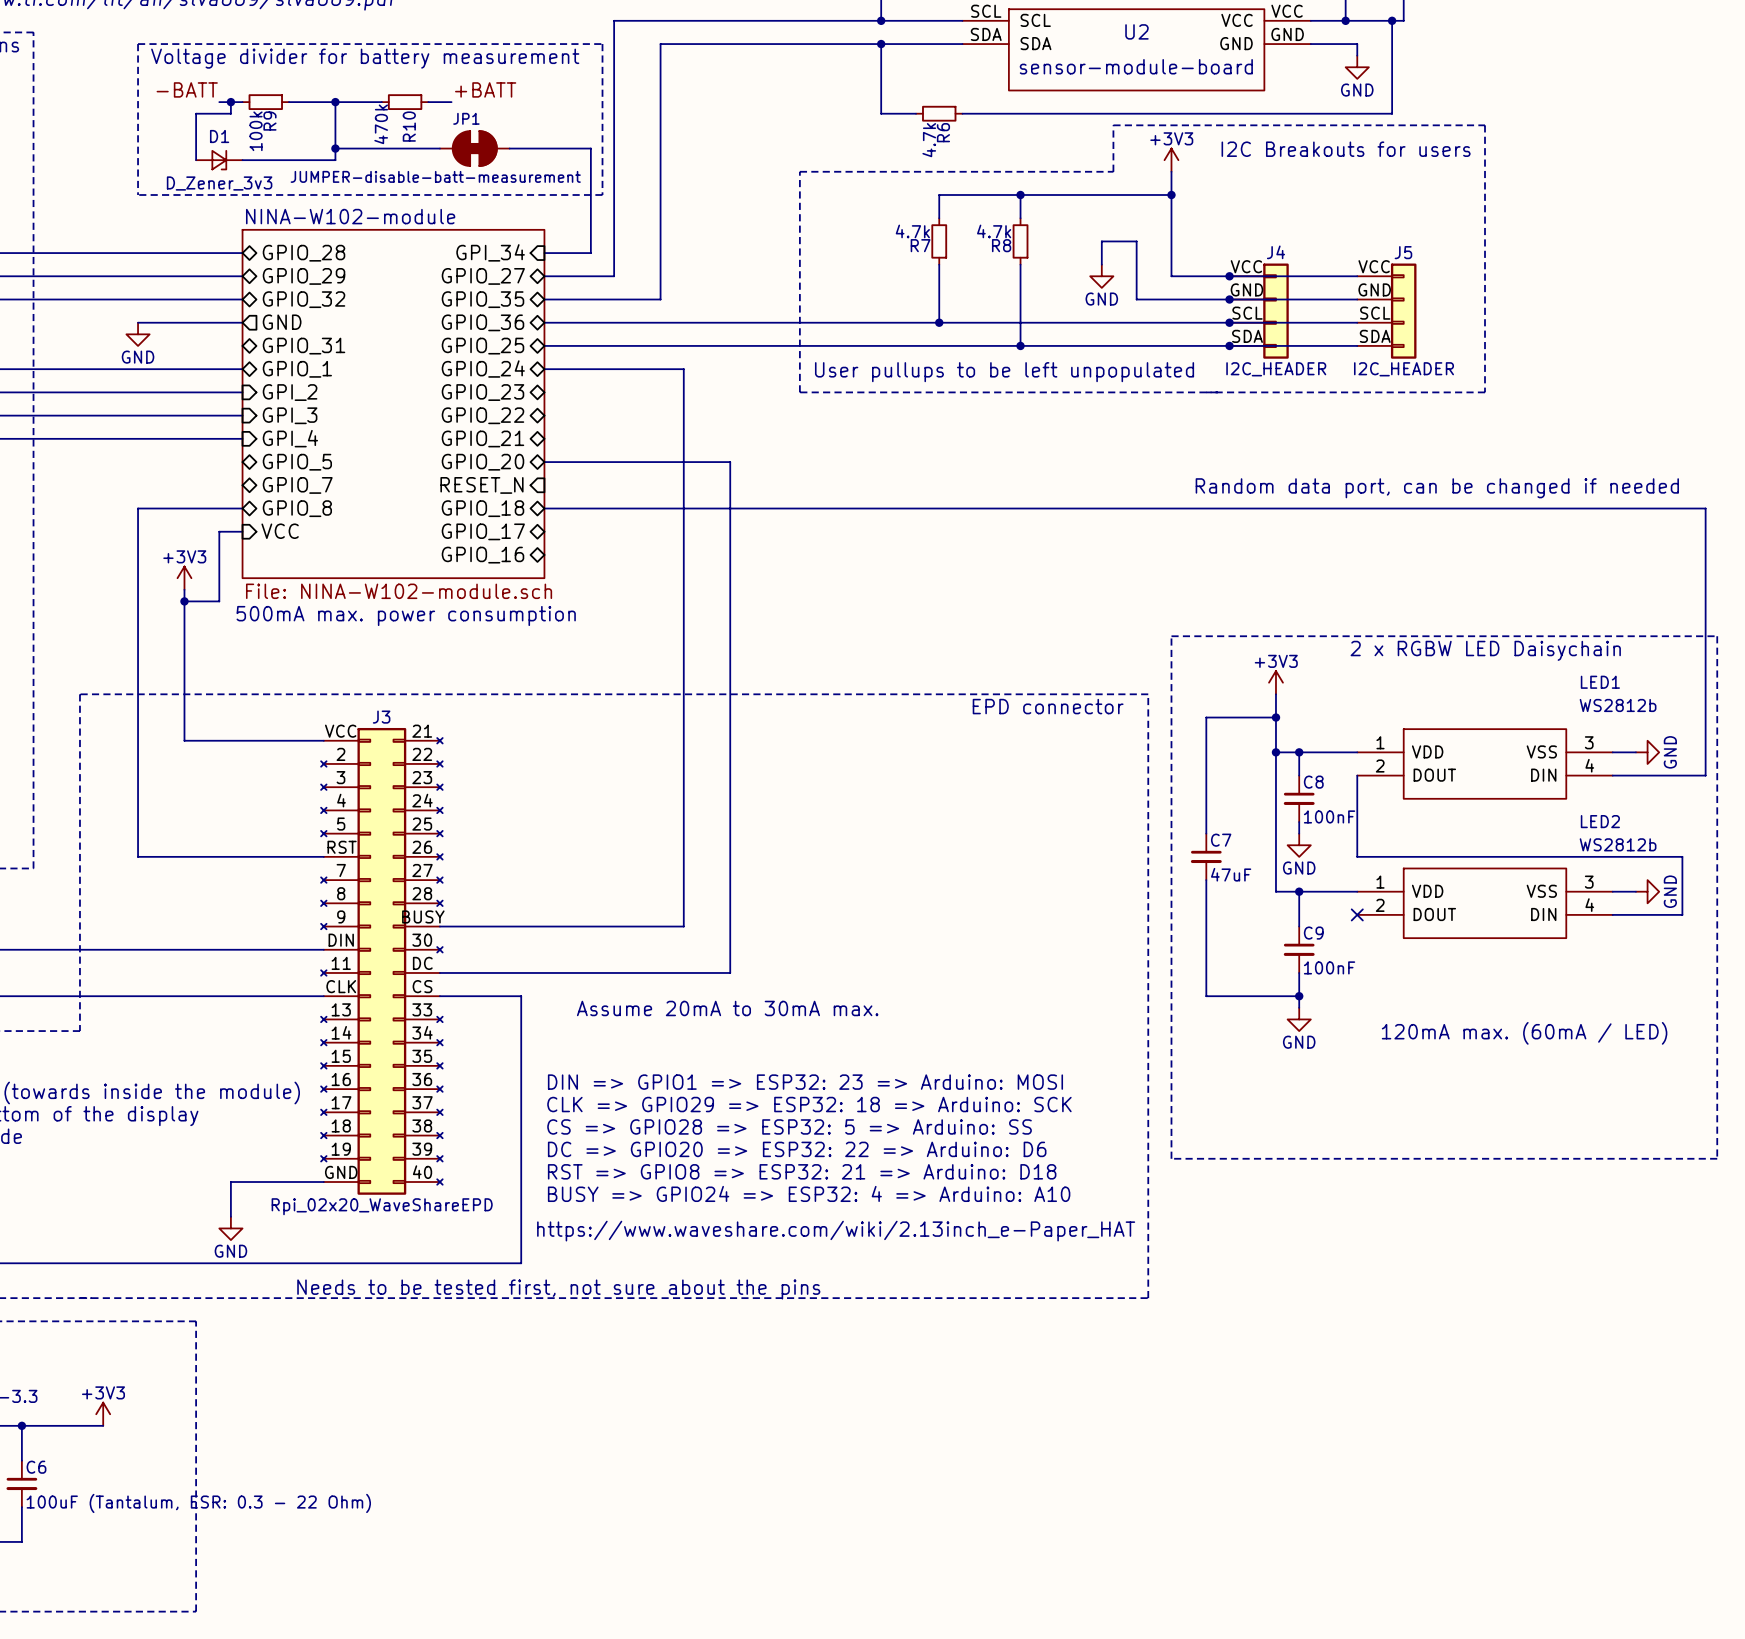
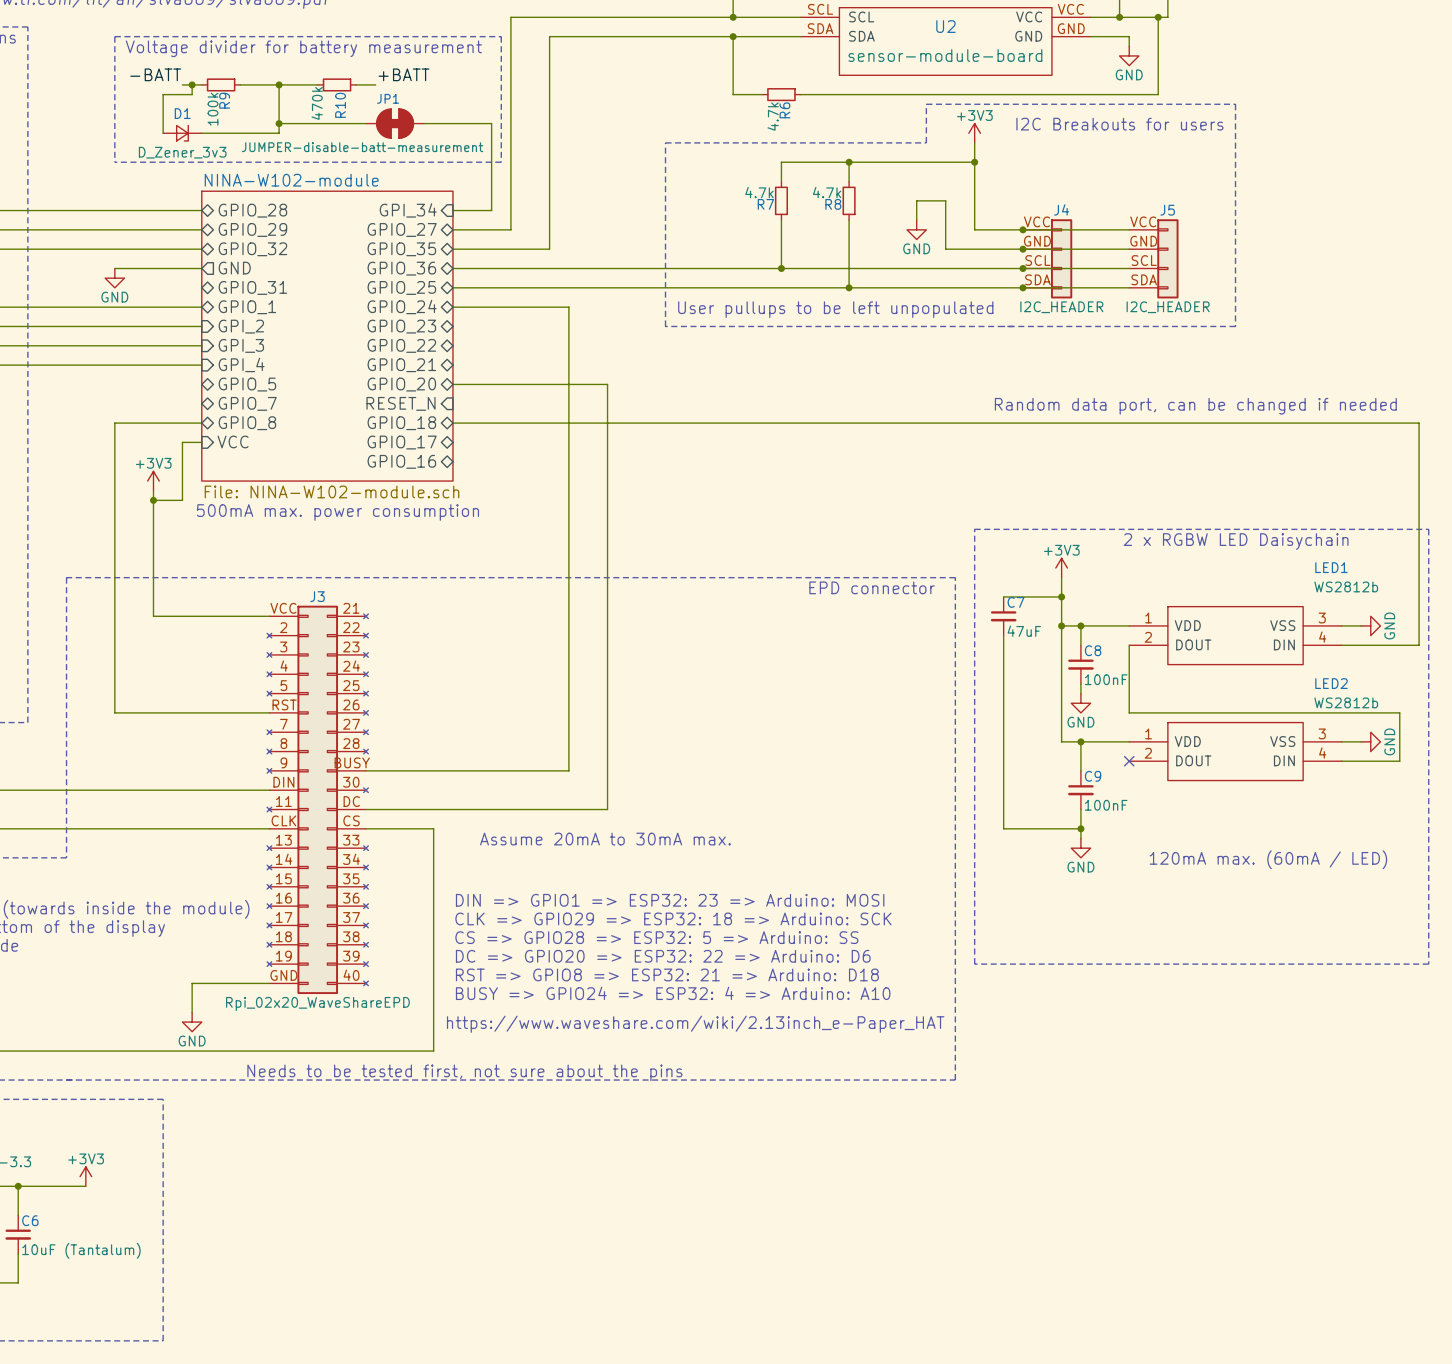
C7 position: (1206, 856) -> (1003, 616)
C6 value: 100uF (Tantalum, ESR: 0.3 - 22 Ohm) (198, 1503) -> 10uF (Tantalum) (81, 1250)

